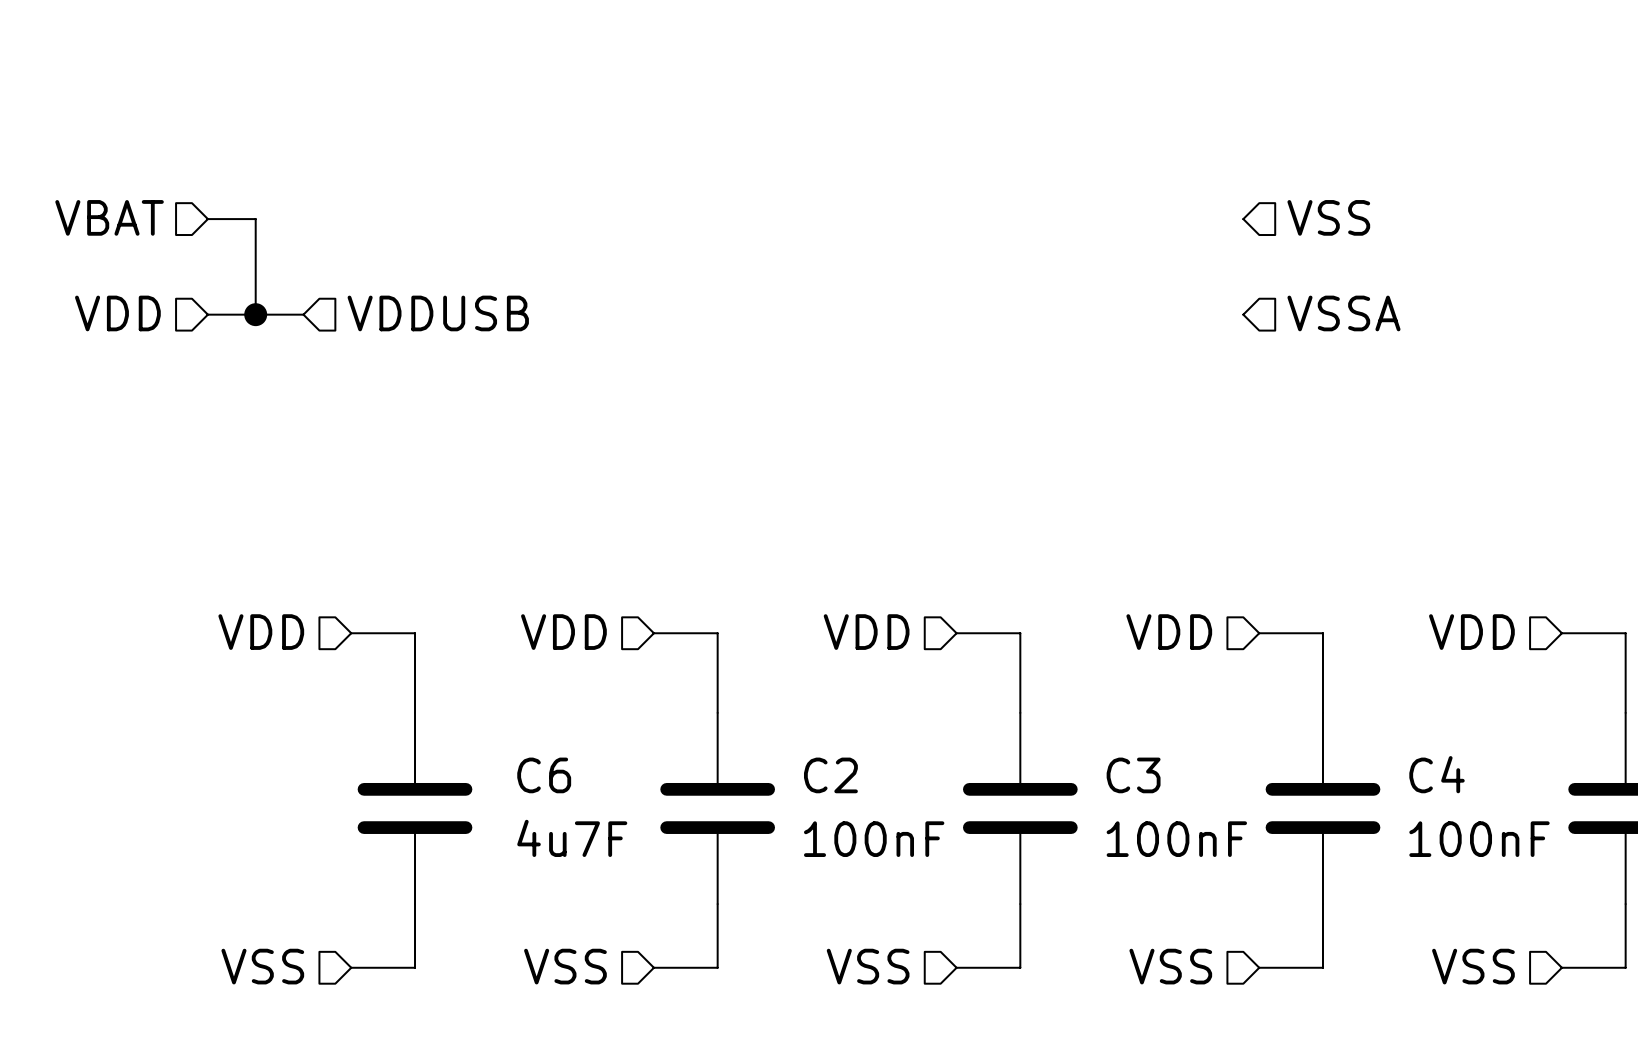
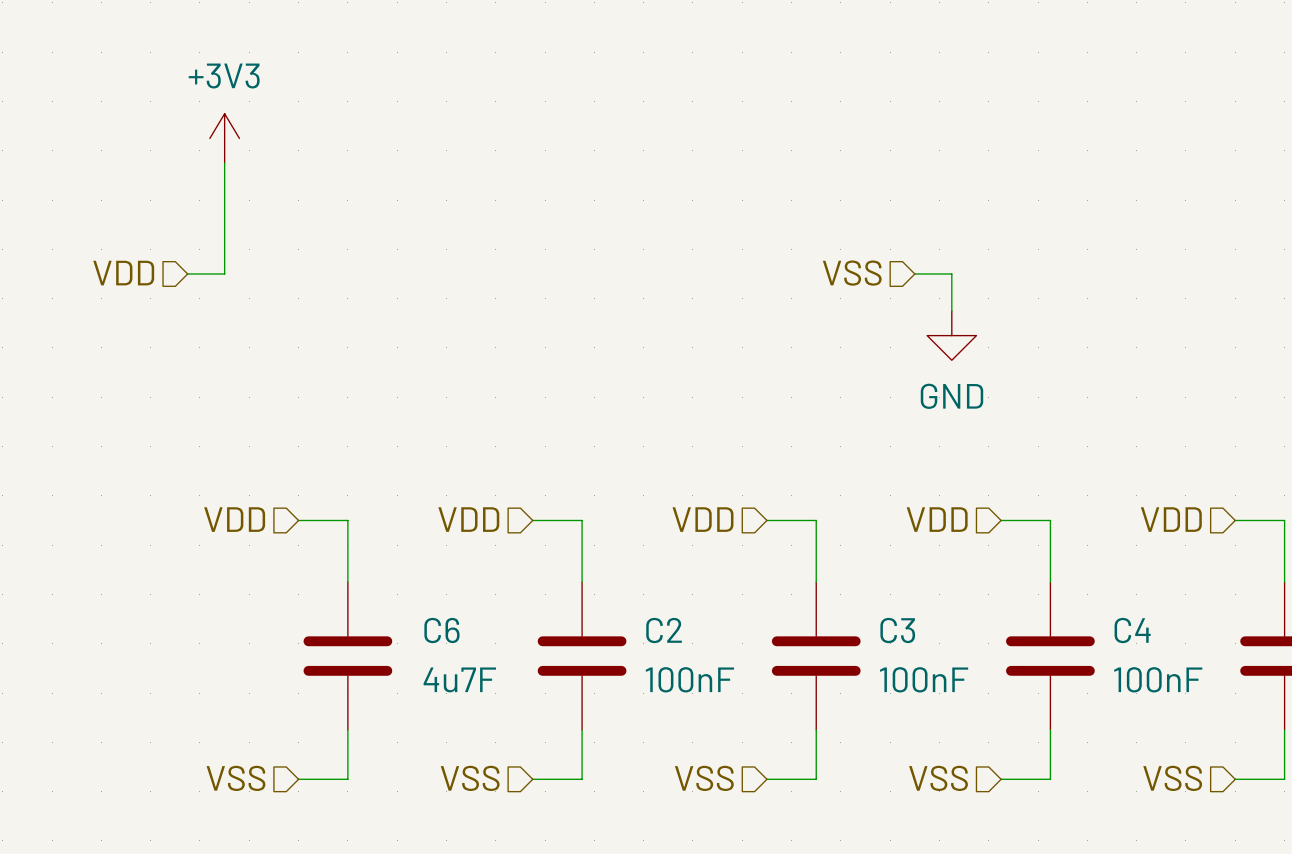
power symbol: none -> +3V3 (224, 138)
hierarchical label: VBAT (109, 217) -> none
hierarchical label rotation: 0° (1328, 217) -> 180° (852, 273)
hierarchical label position: VSS (1328, 217) -> VSS (852, 273)
wire: (207, 219) (255, 219) -> (224, 163) (224, 200)
hierarchical label: VDDUSB (438, 313) -> none
hierarchical label: VSSA (1343, 313) -> none
wire: (255, 314) (303, 314) -> none
junction: (255, 314) -> none
wire: none -> (914, 273) (951, 273) (951, 310)
power symbol: none -> GND (951, 335)

